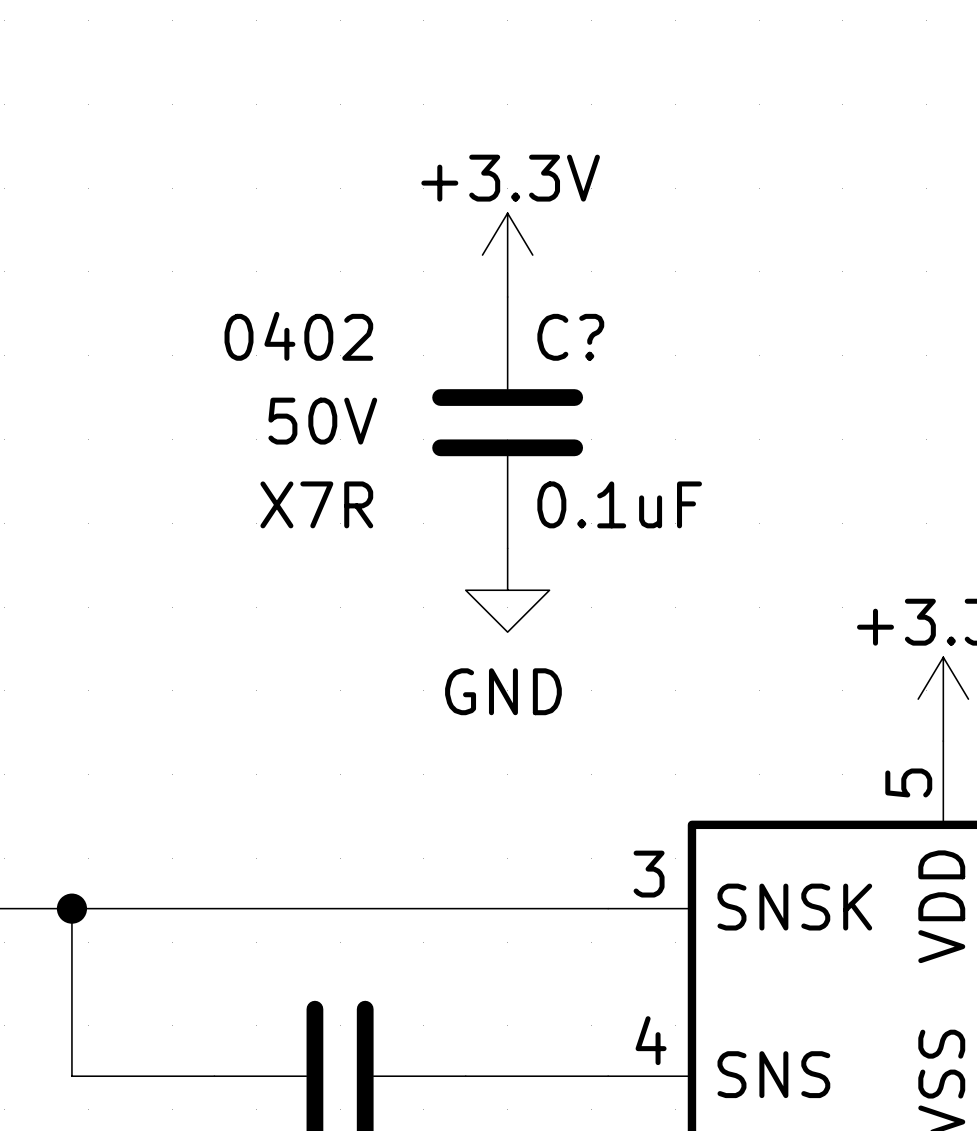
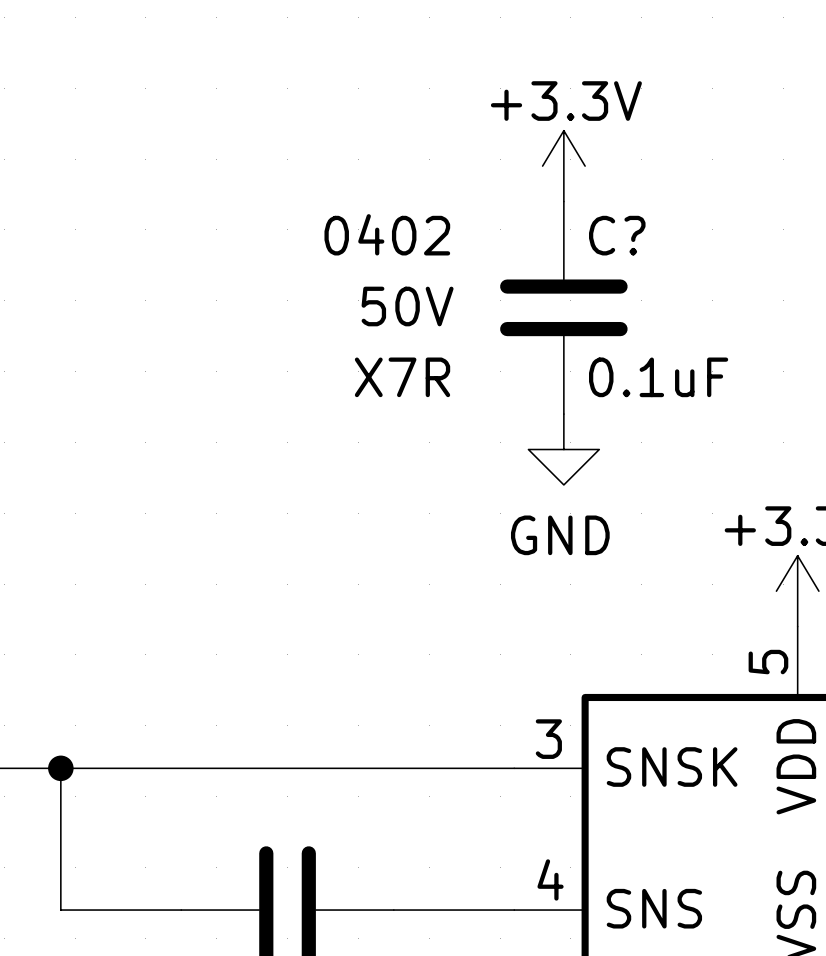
power symbol position: +3.3V (507, 255) -> +3.3V (563, 166)
C? position: (507, 422) -> (563, 307)
power symbol position: GND (507, 590) -> GND (563, 449)

